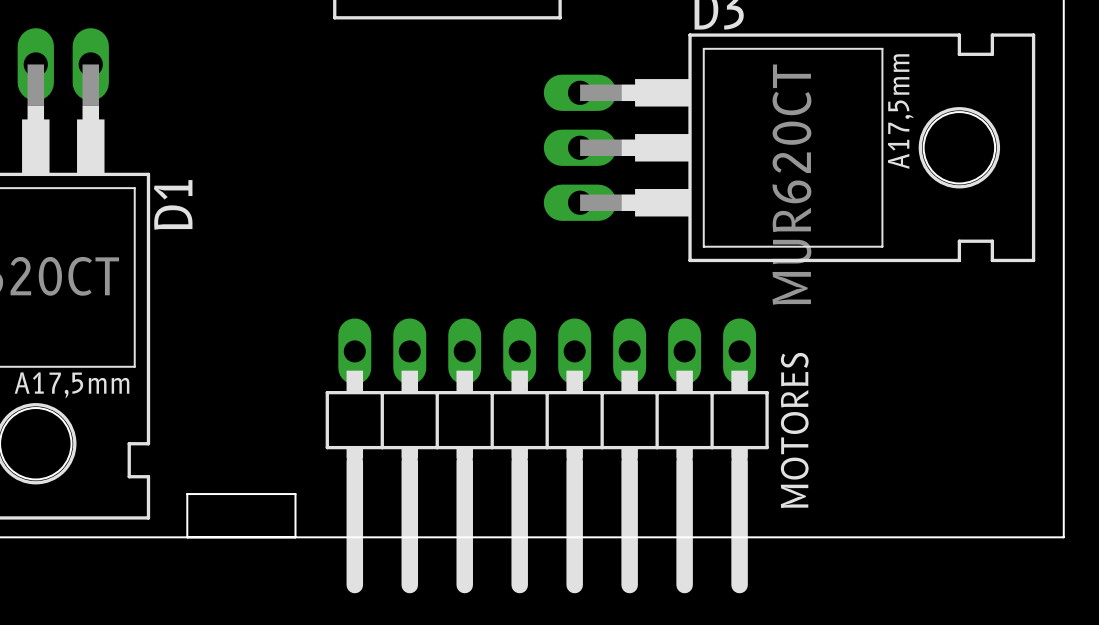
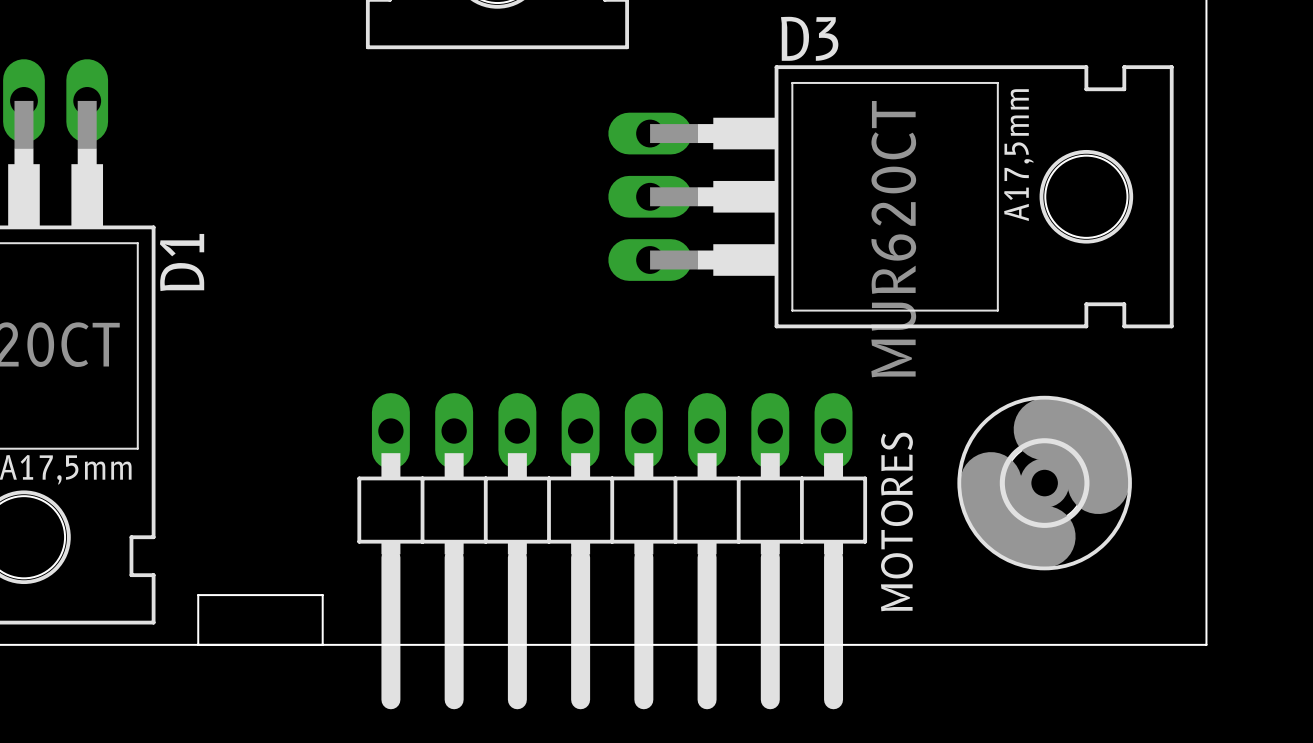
part: none -> (1044, 483)

